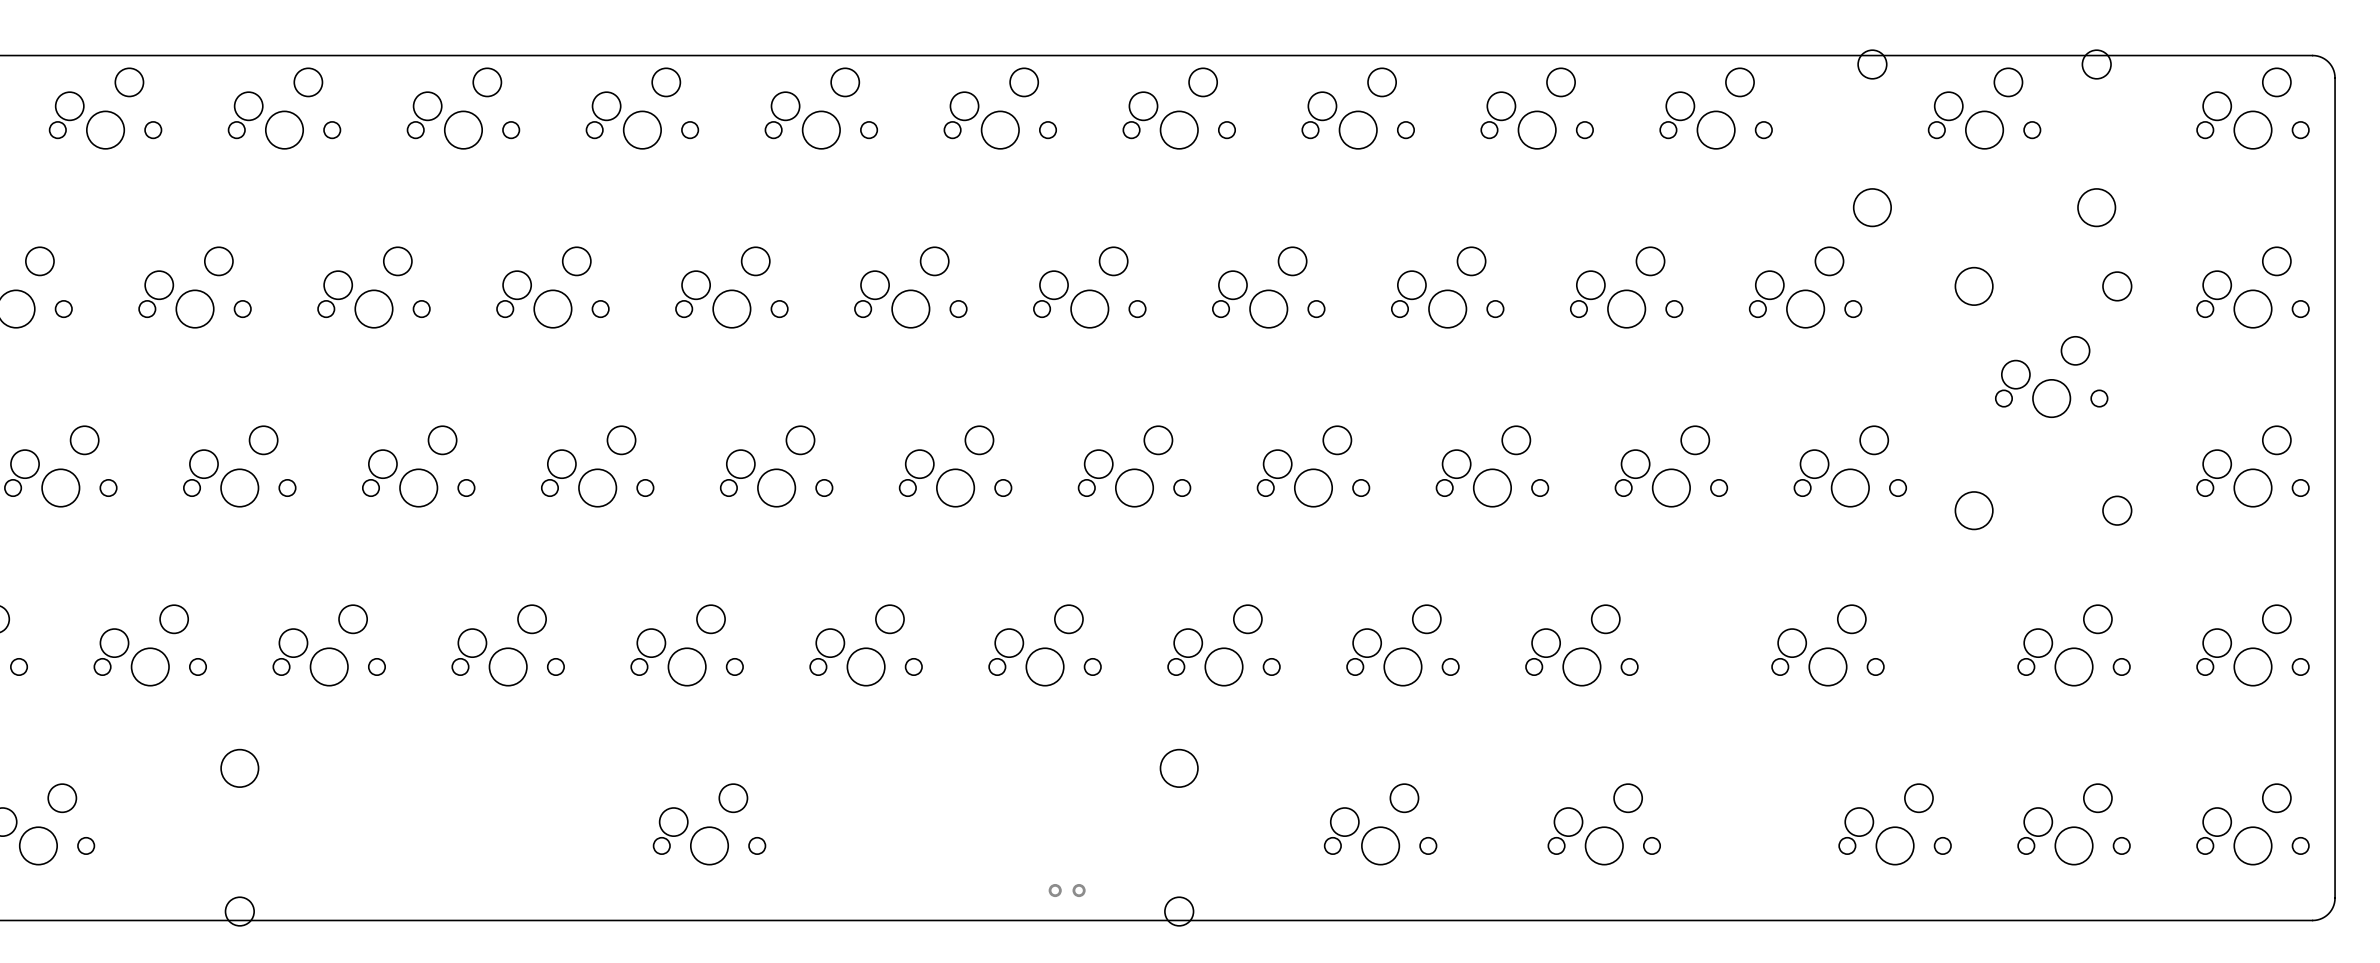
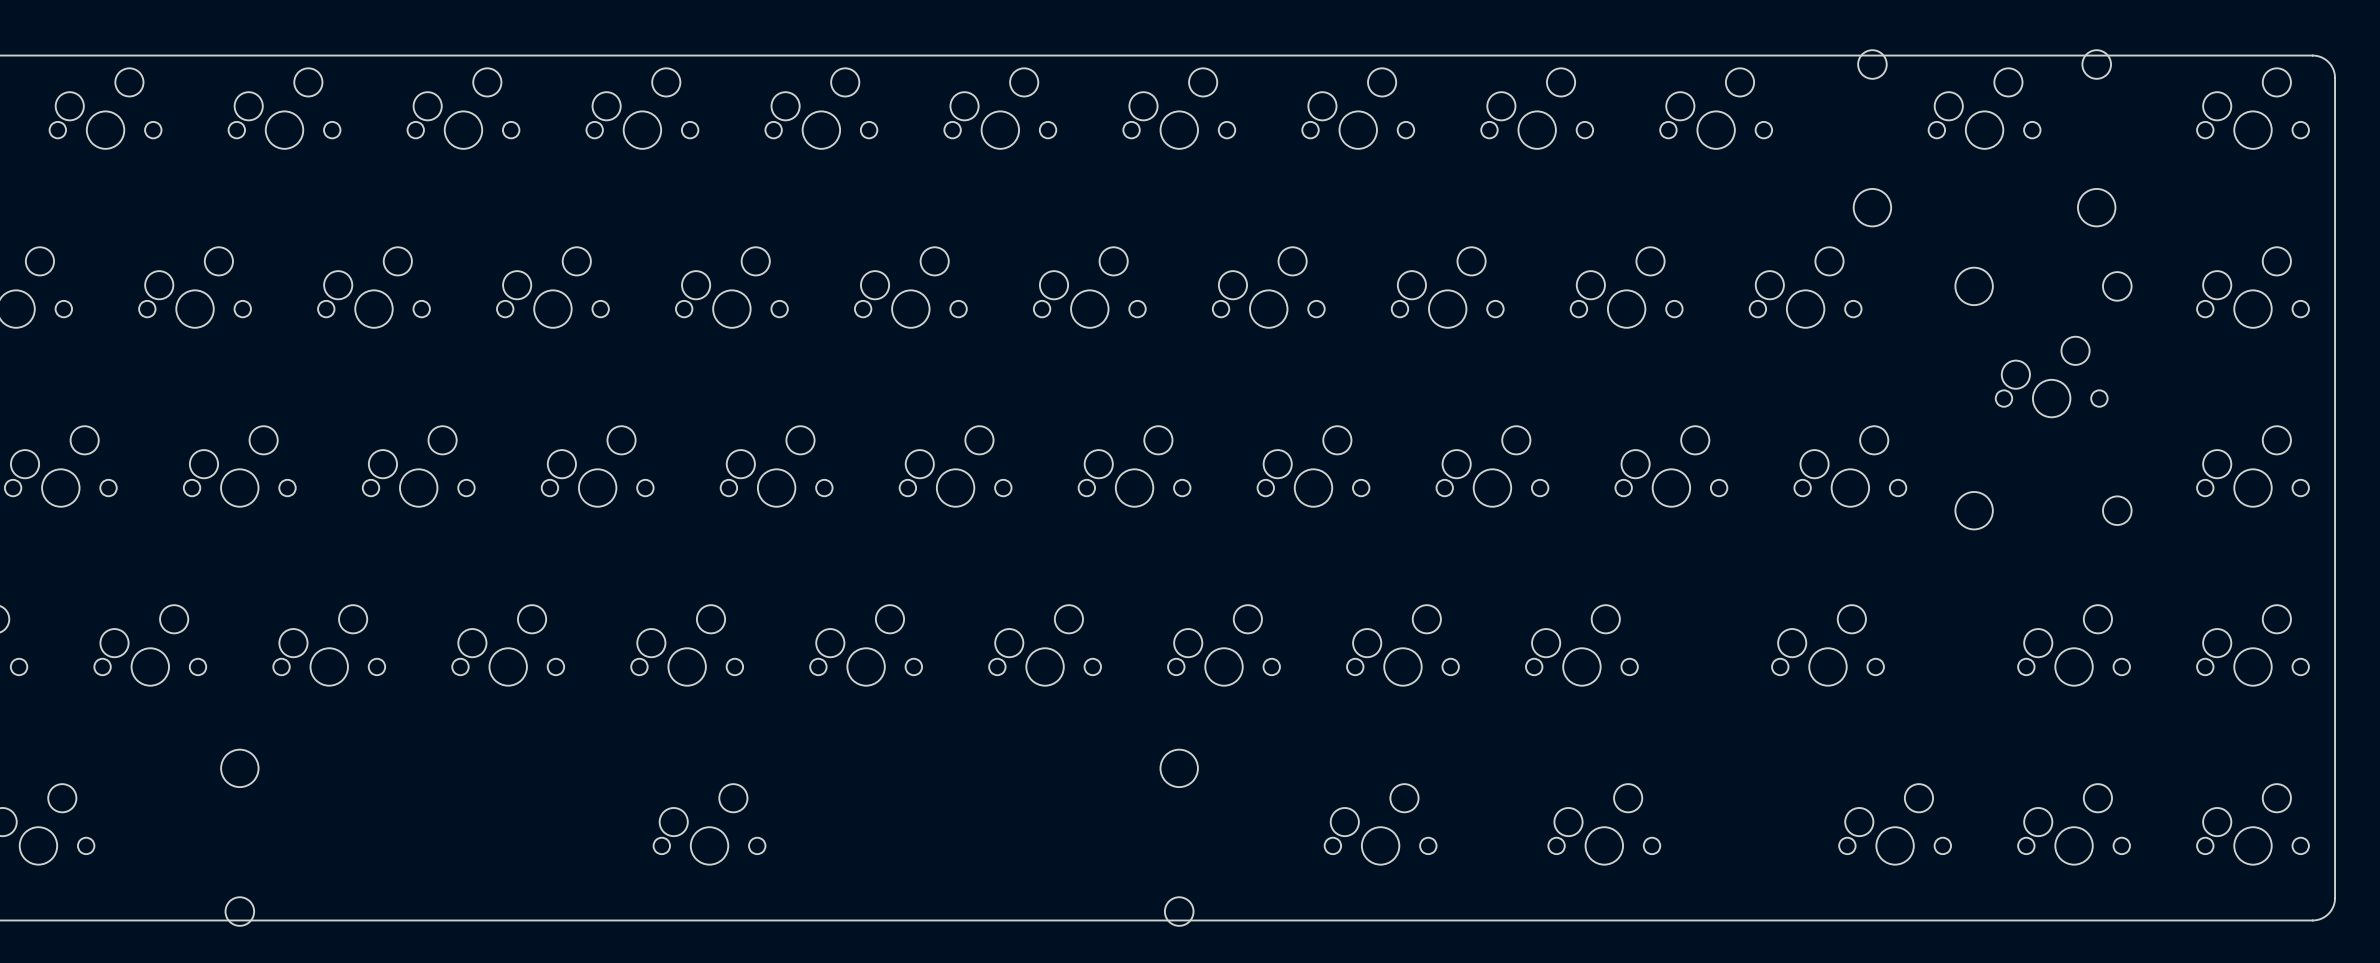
part: (1067, 890) -> none

